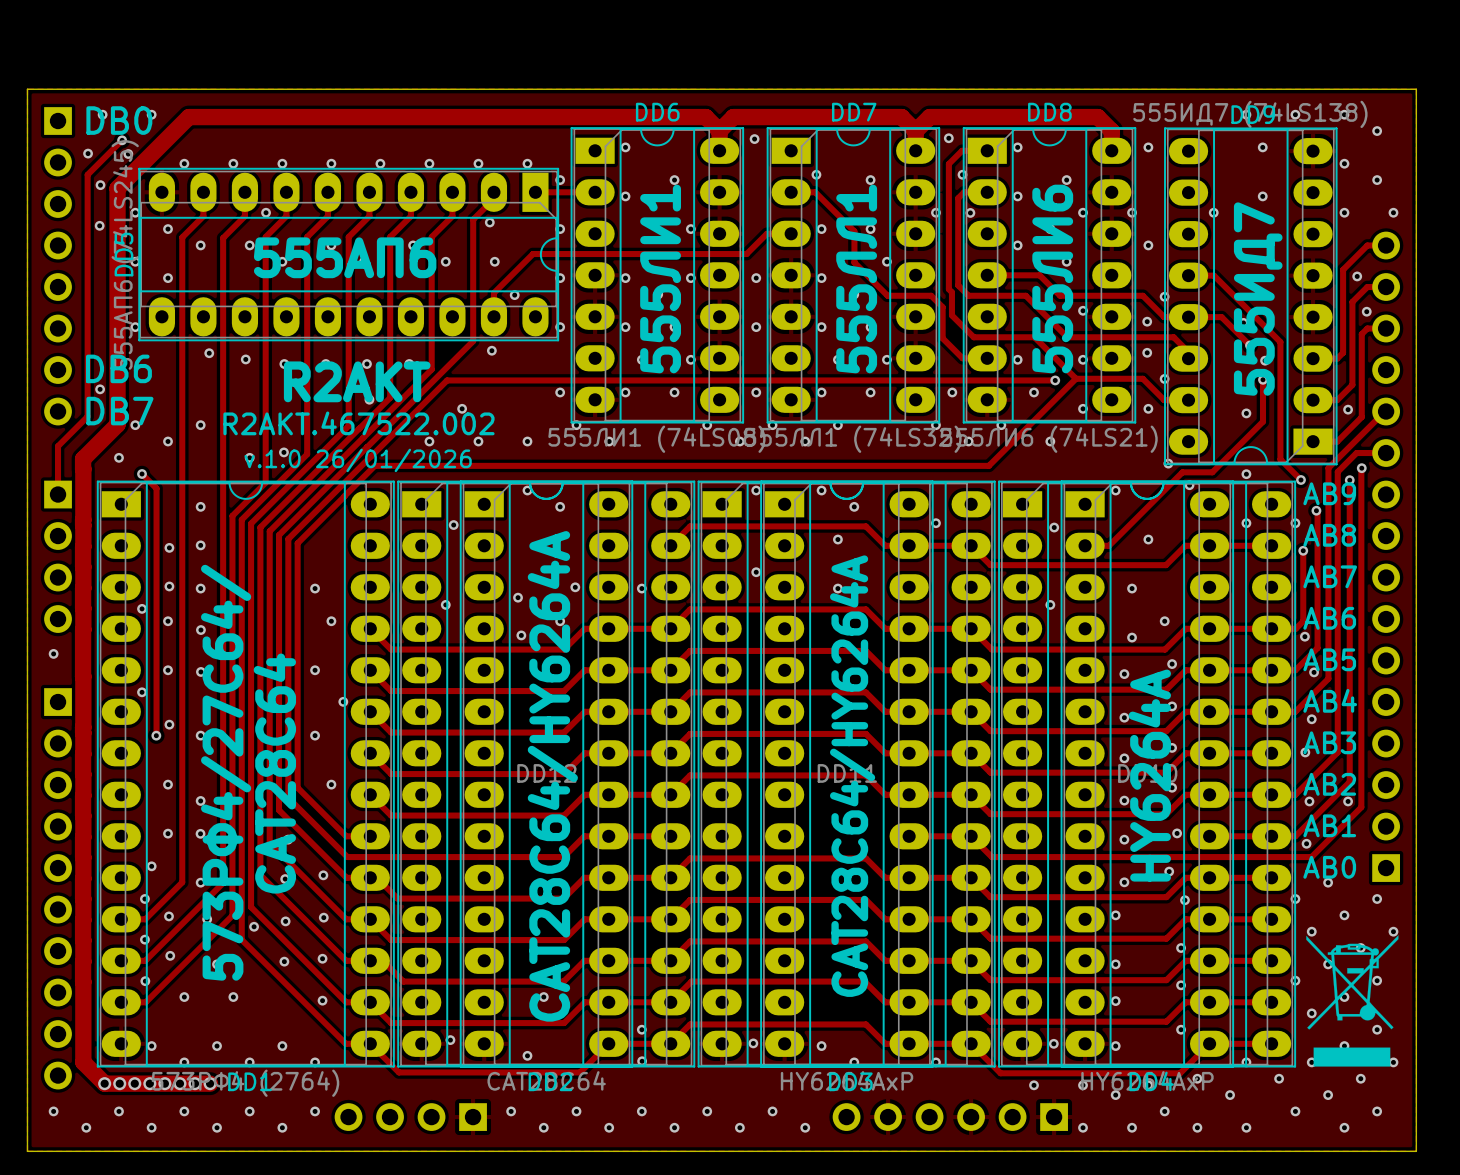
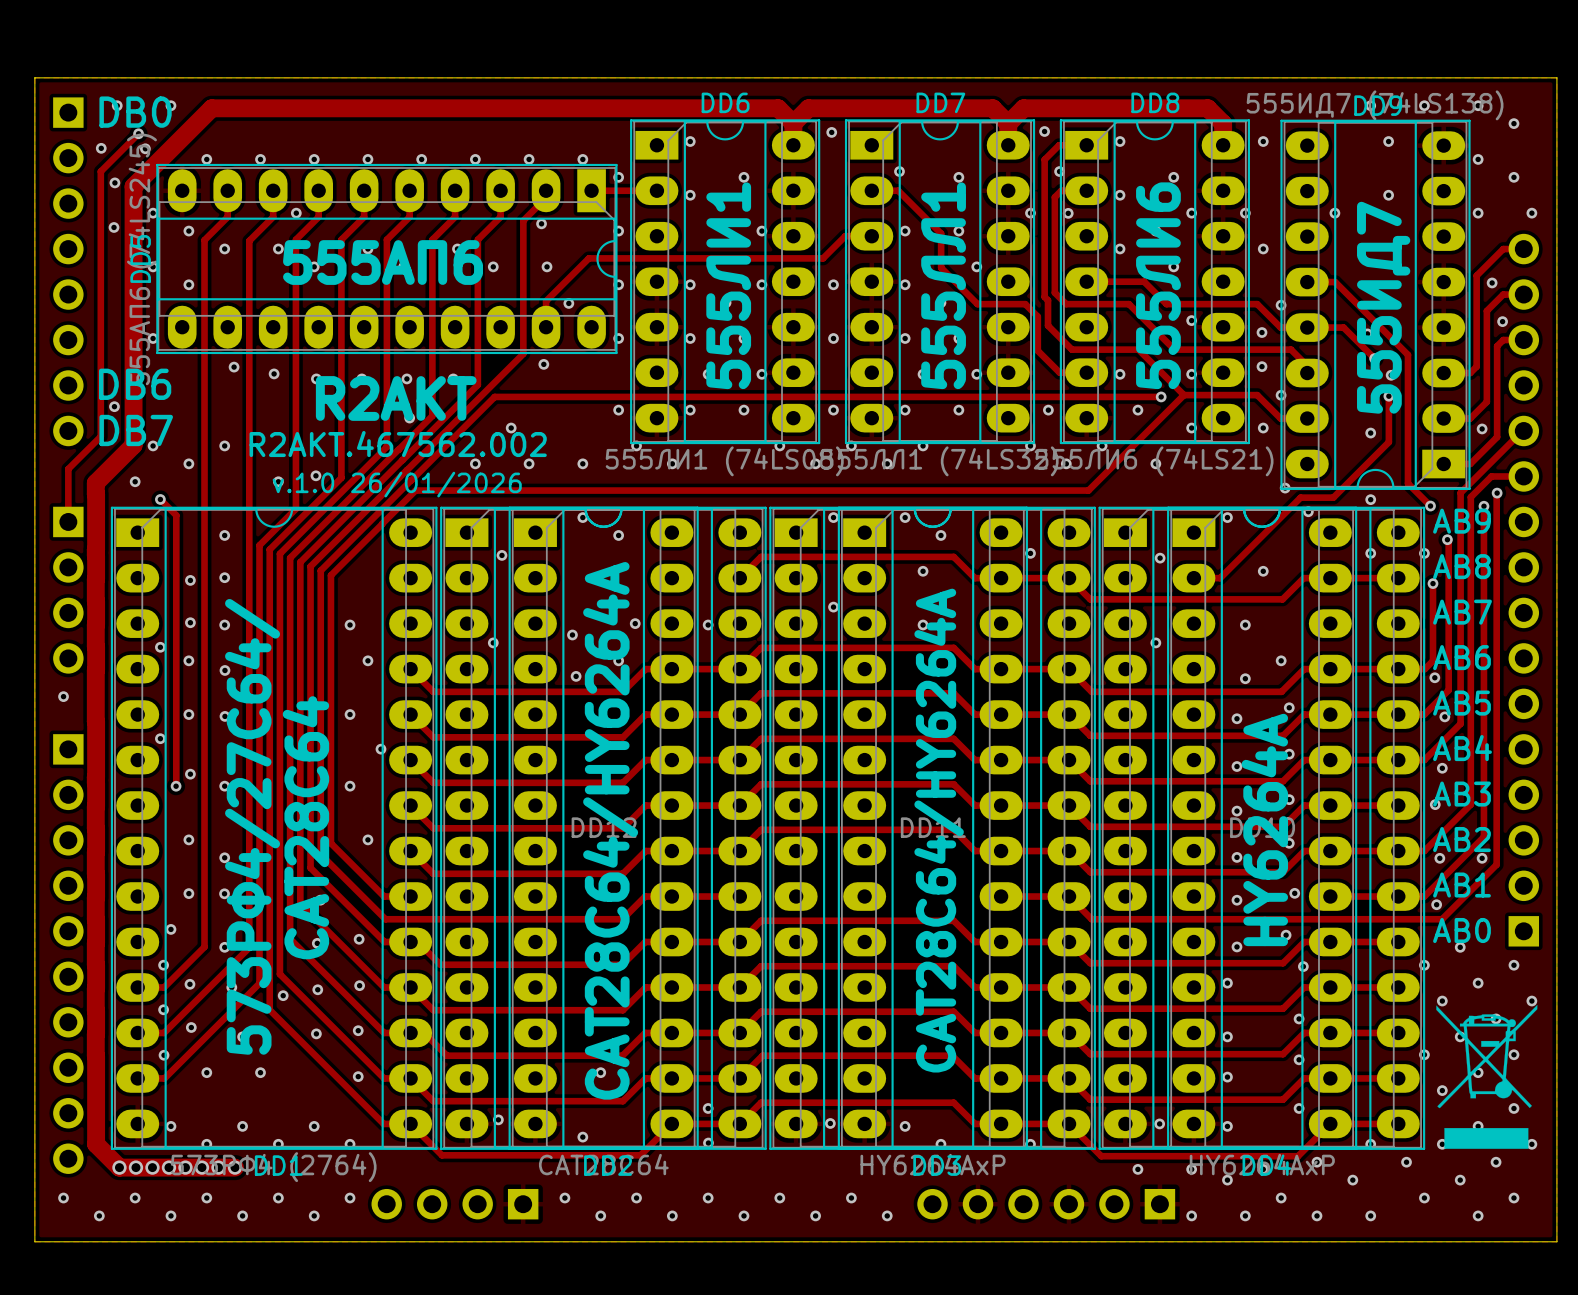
text: R2AKT.467522.002 (358, 423) -> R2AKT.467562.002 (398, 444)

